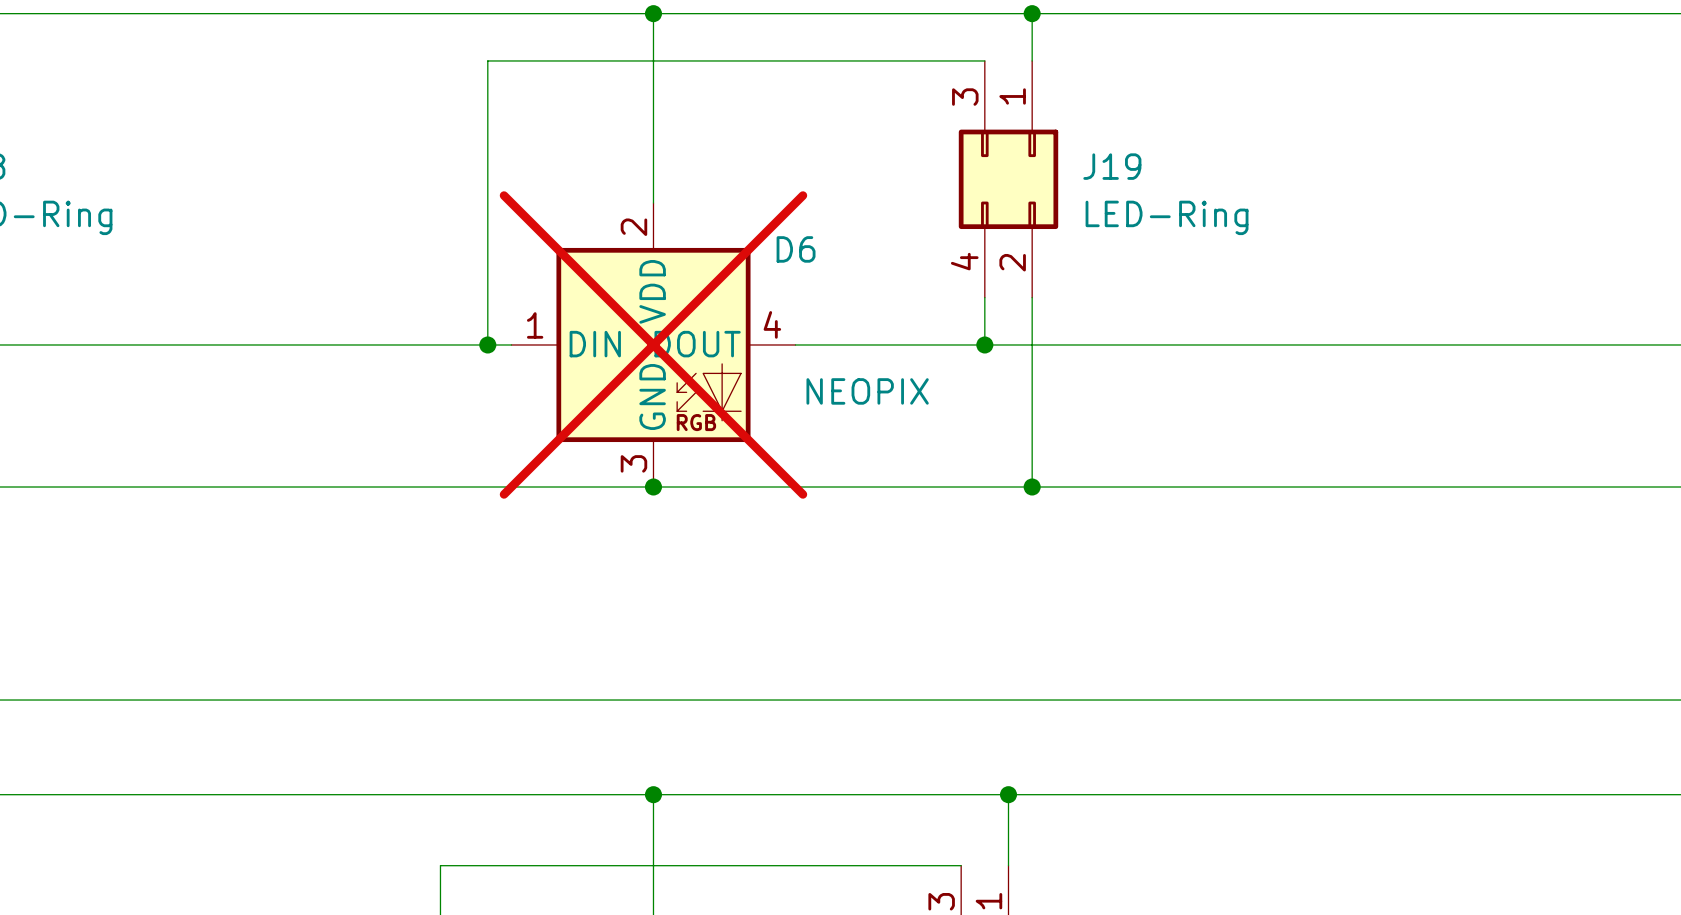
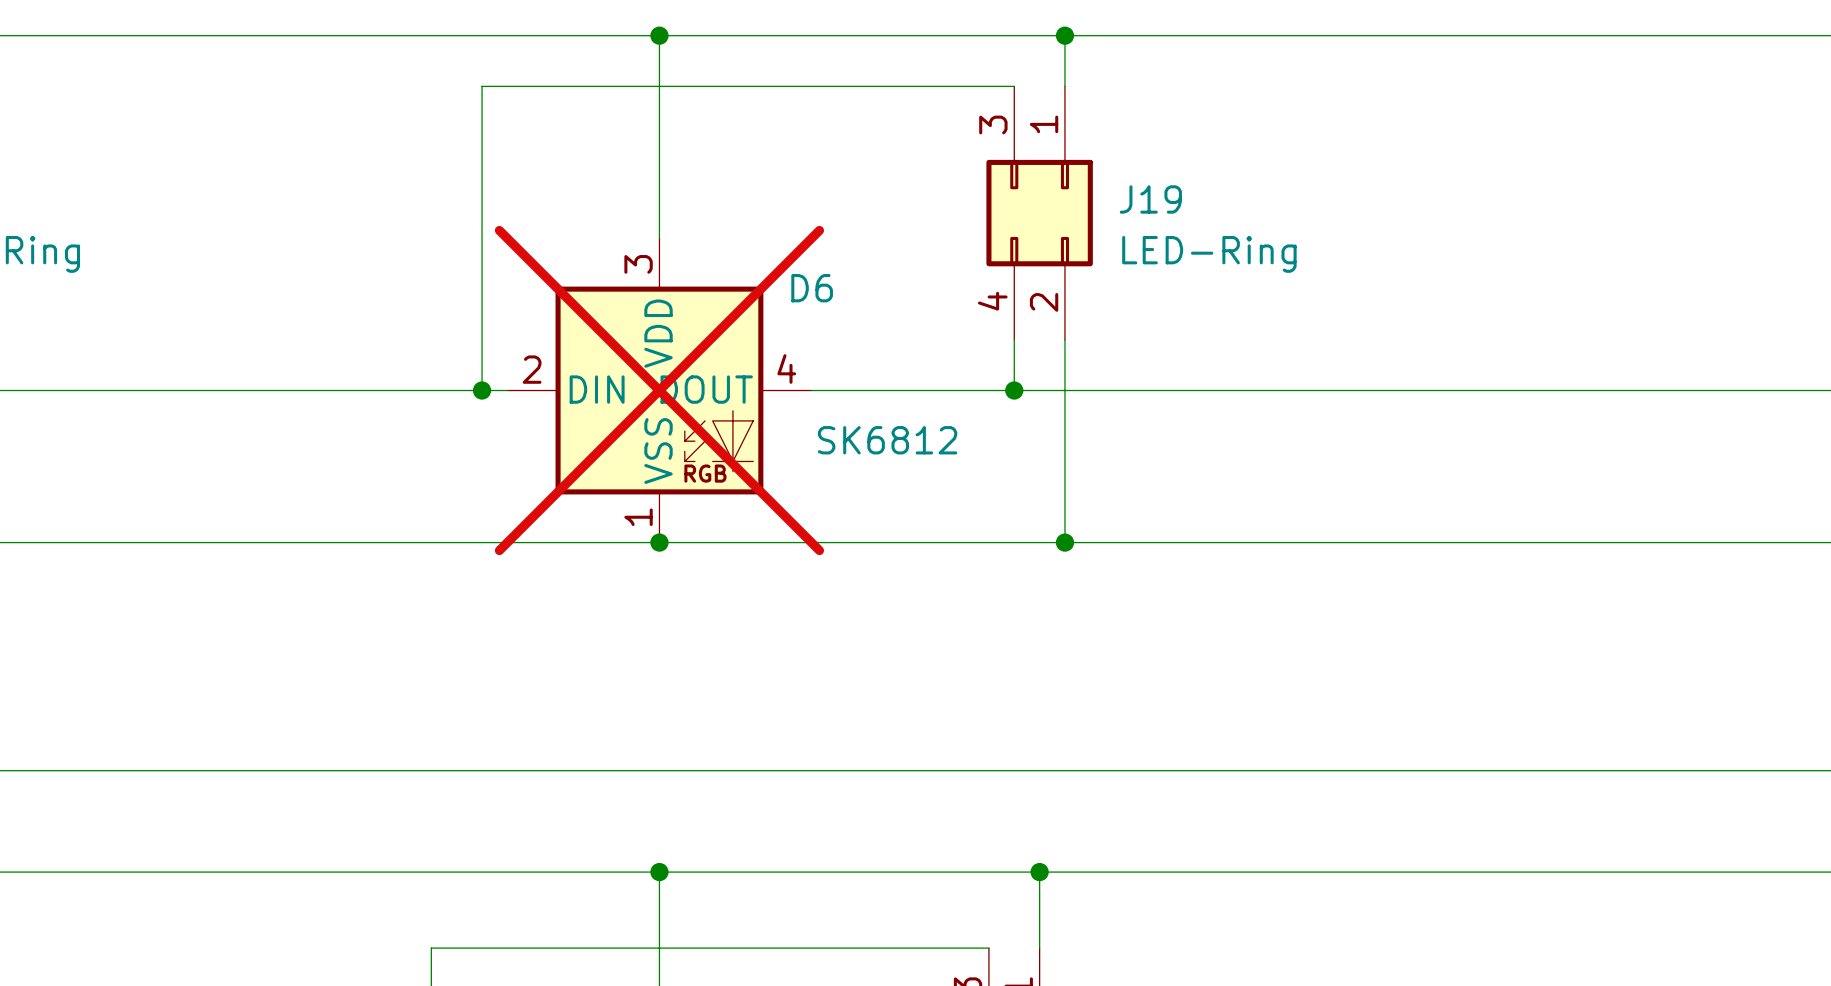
D6 pin number: 2 (633, 227) -> 3 (638, 264)
D6 pin number: 1 (535, 325) -> 2 (532, 369)
D6 value: NEOPIX (867, 391) -> SK6812 (887, 440)
D6 pin name: GND (652, 396) -> VSS (658, 451)
D6 pin number: 3 (633, 463) -> 1 (638, 517)

